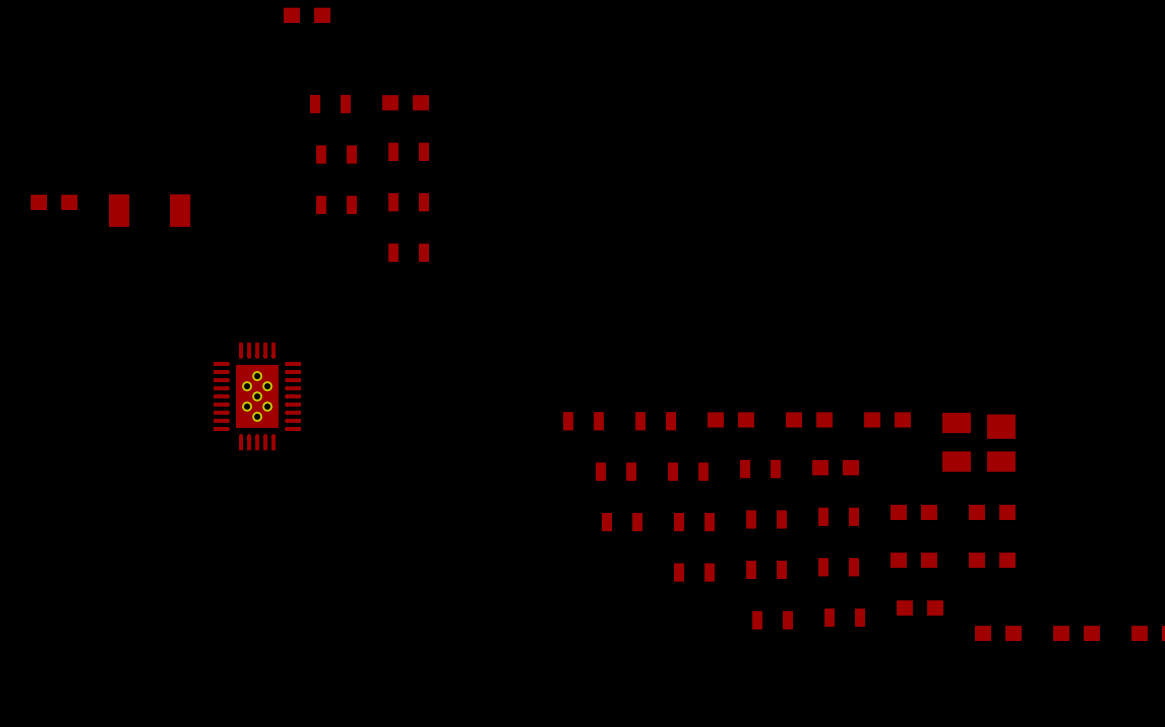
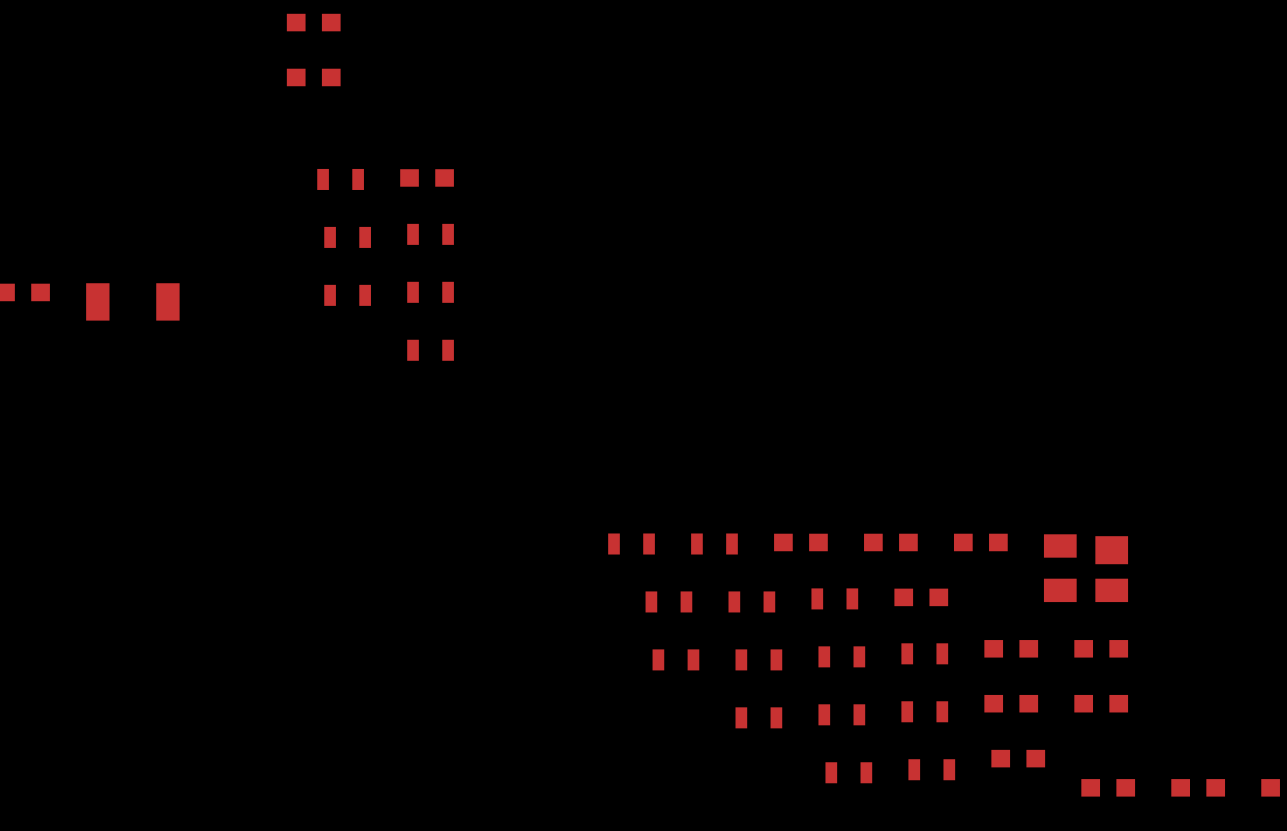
part: (257, 396) -> none

